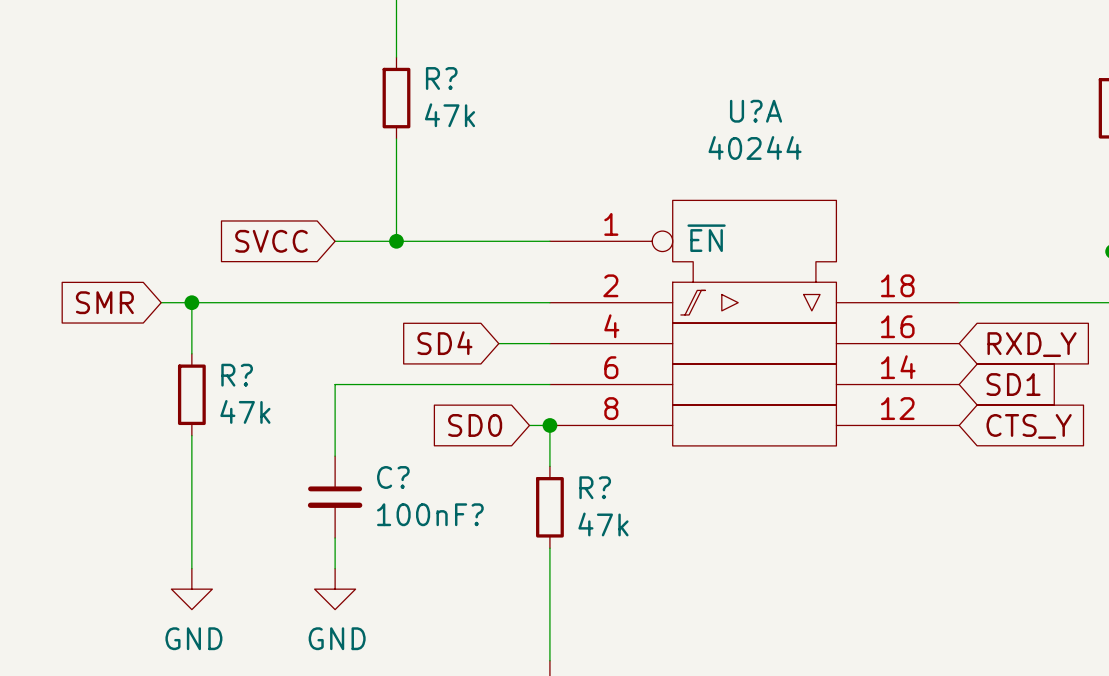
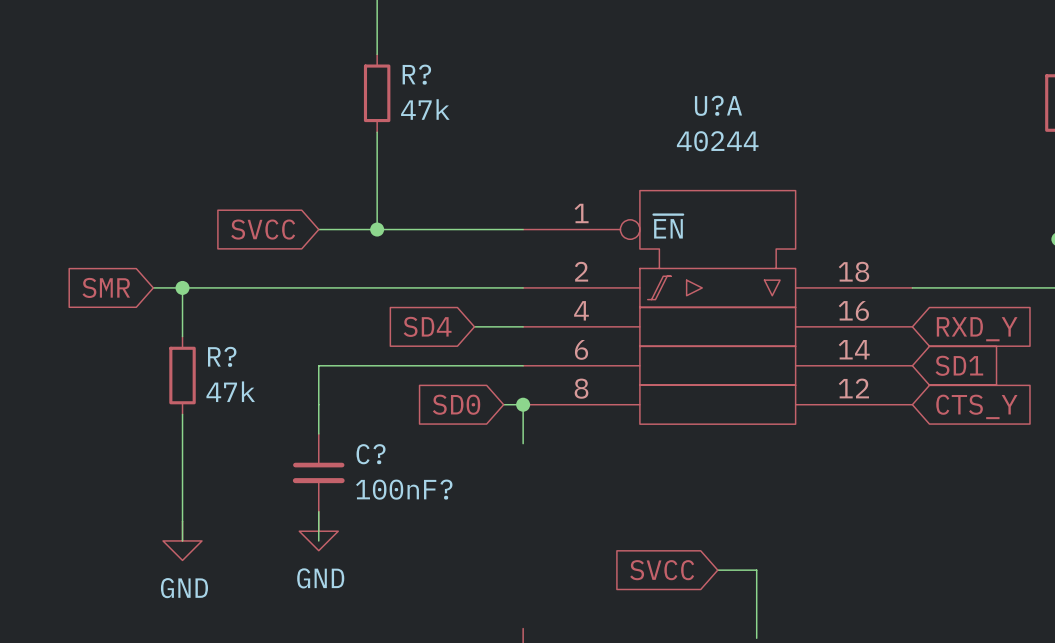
R?: 47k (549, 507) -> none
wire: (549, 548) (549, 660) -> none
power symbol position: GND (191, 589) -> GND (182, 540)
power symbol position: GND (335, 589) -> GND (318, 531)
global label: none -> SVCC (662, 570)
wire: none -> (717, 570) (756, 570) (756, 638)

